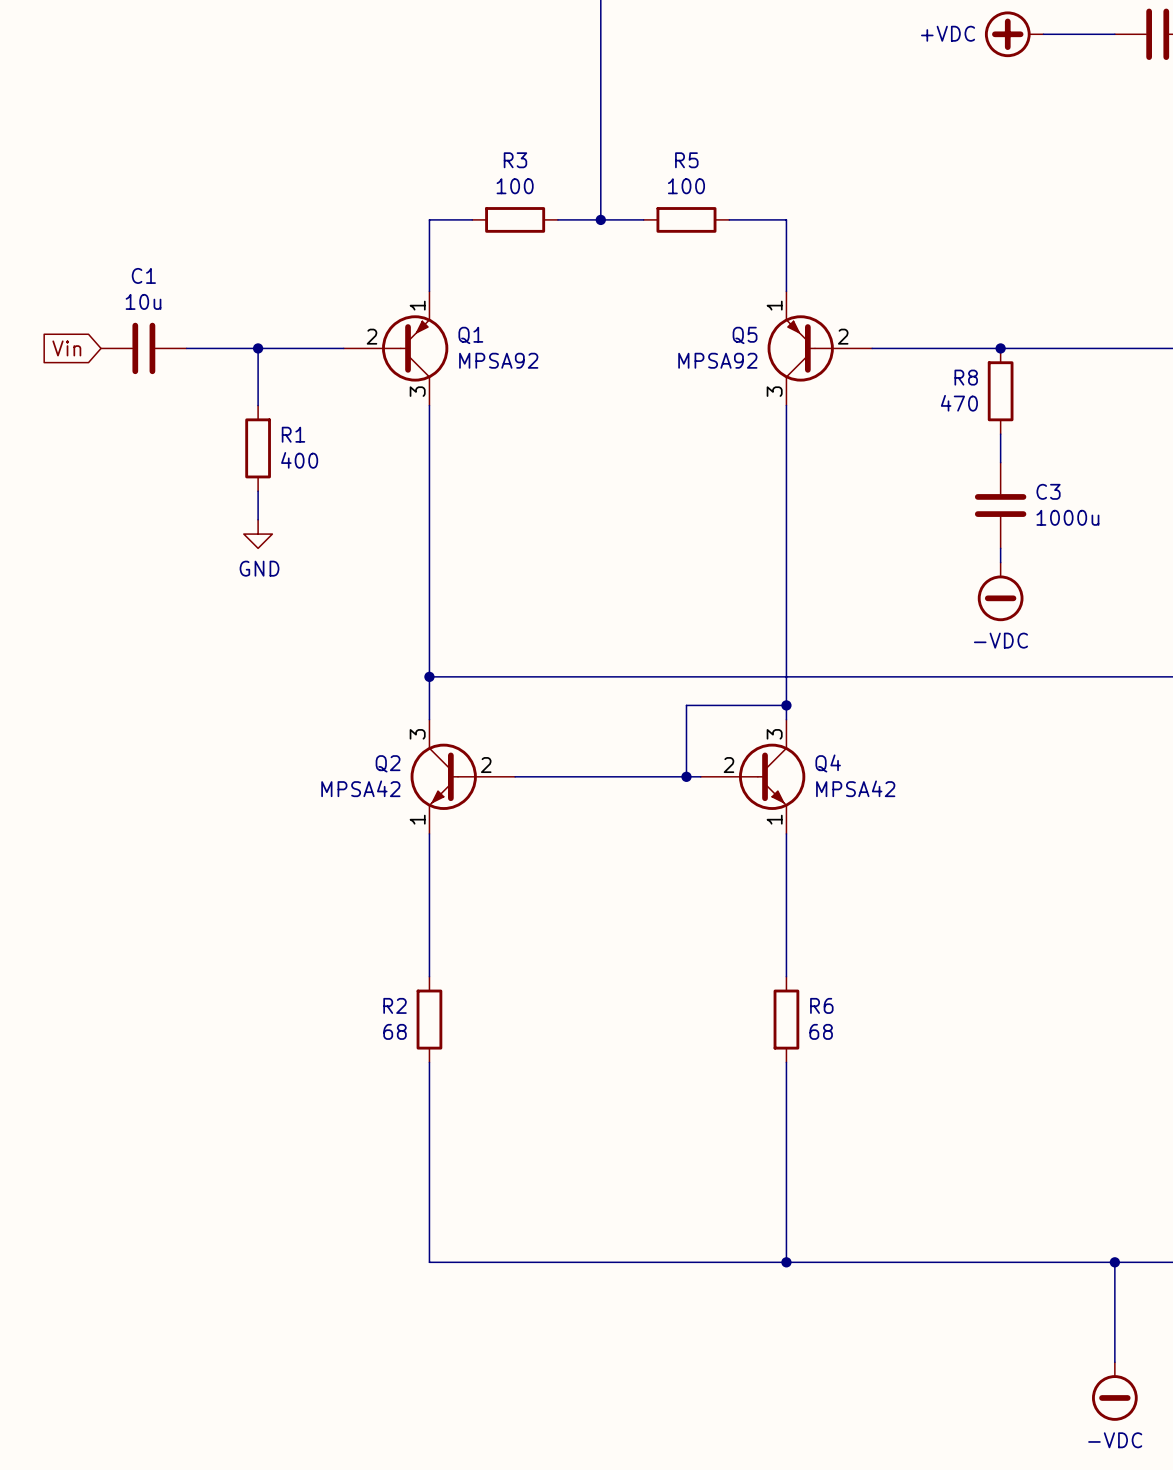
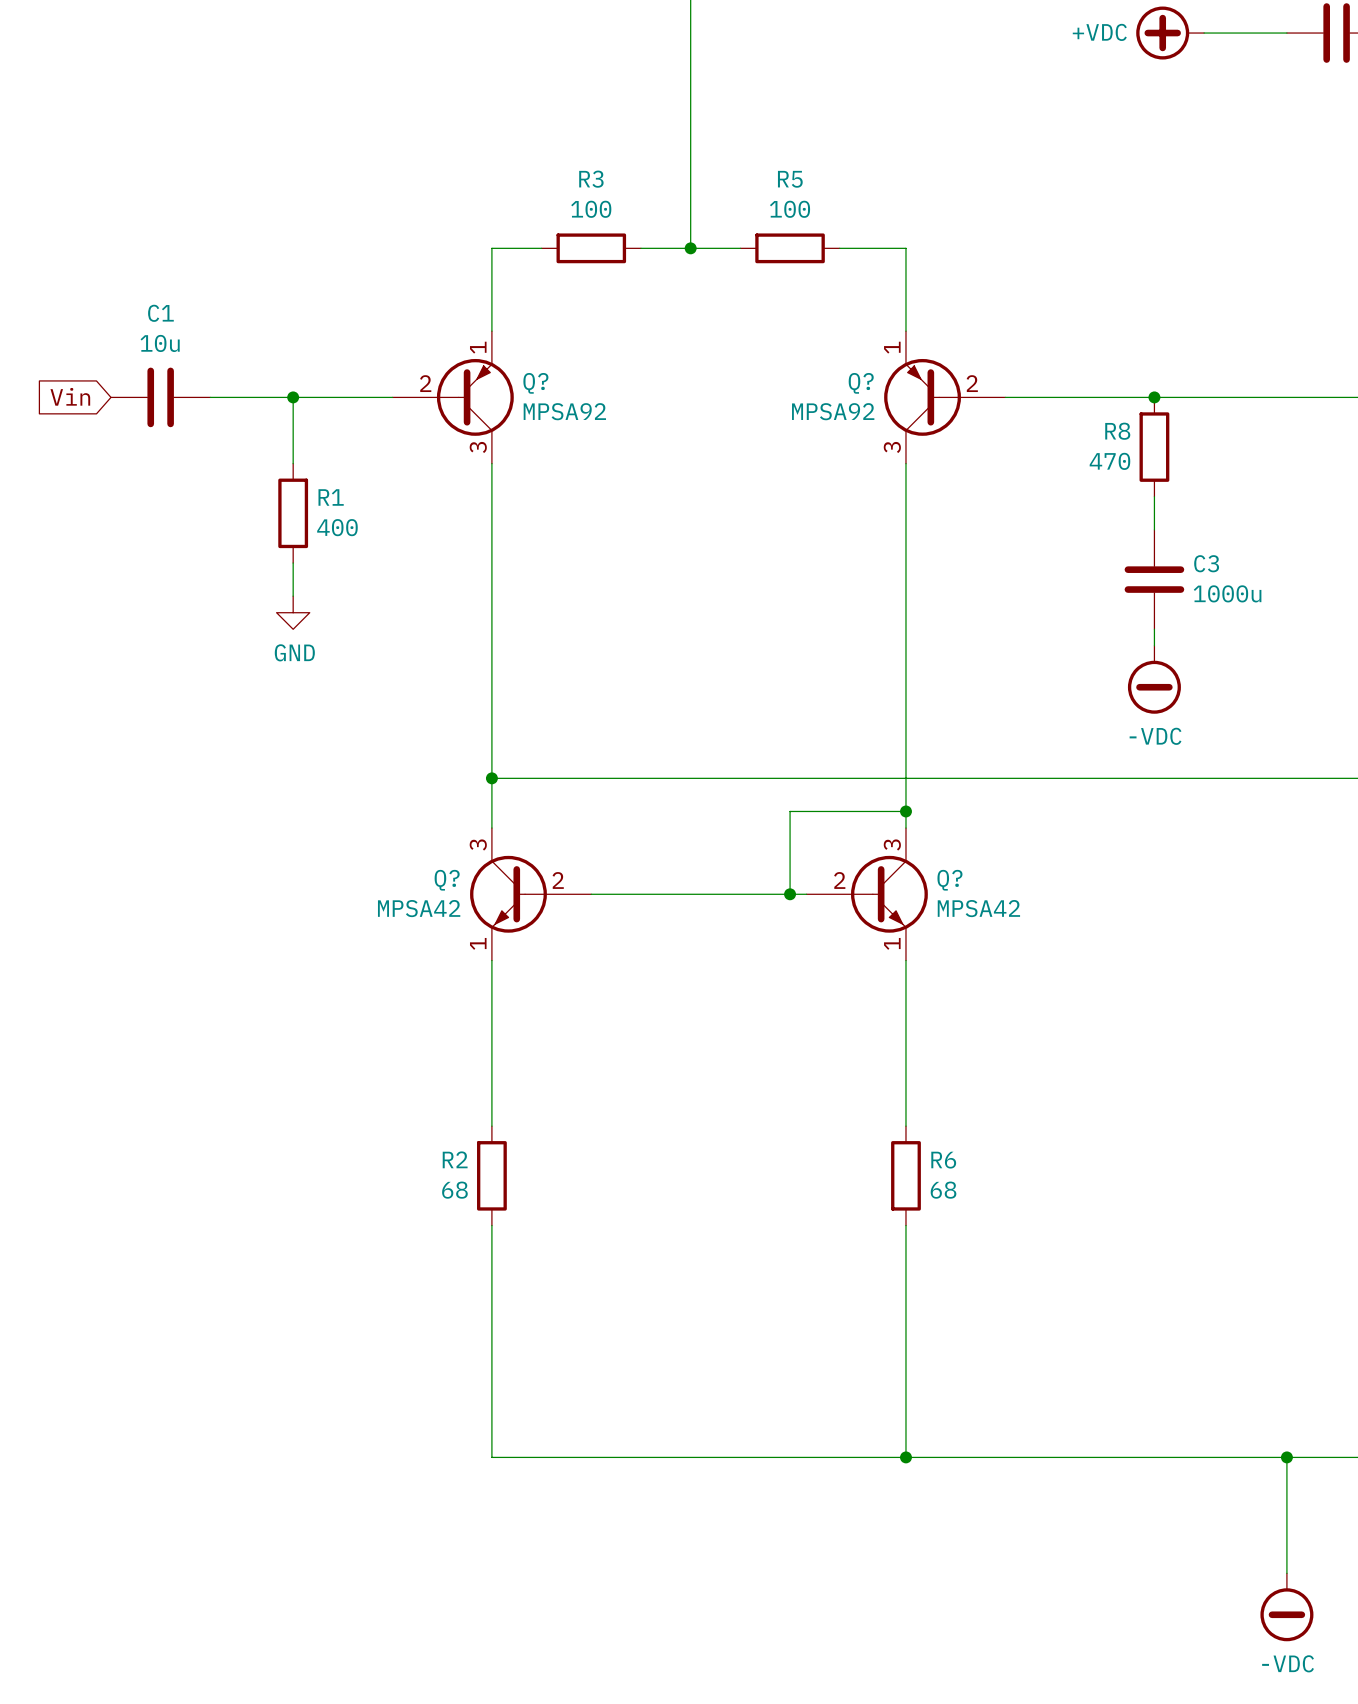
Q1 name: Q1 (470, 335) -> Q? (535, 383)
Q5 name: Q5 (745, 335) -> Q? (861, 383)
Q2 name: Q2 (388, 763) -> Q? (447, 880)
Q4 name: Q4 (828, 763) -> Q? (949, 880)

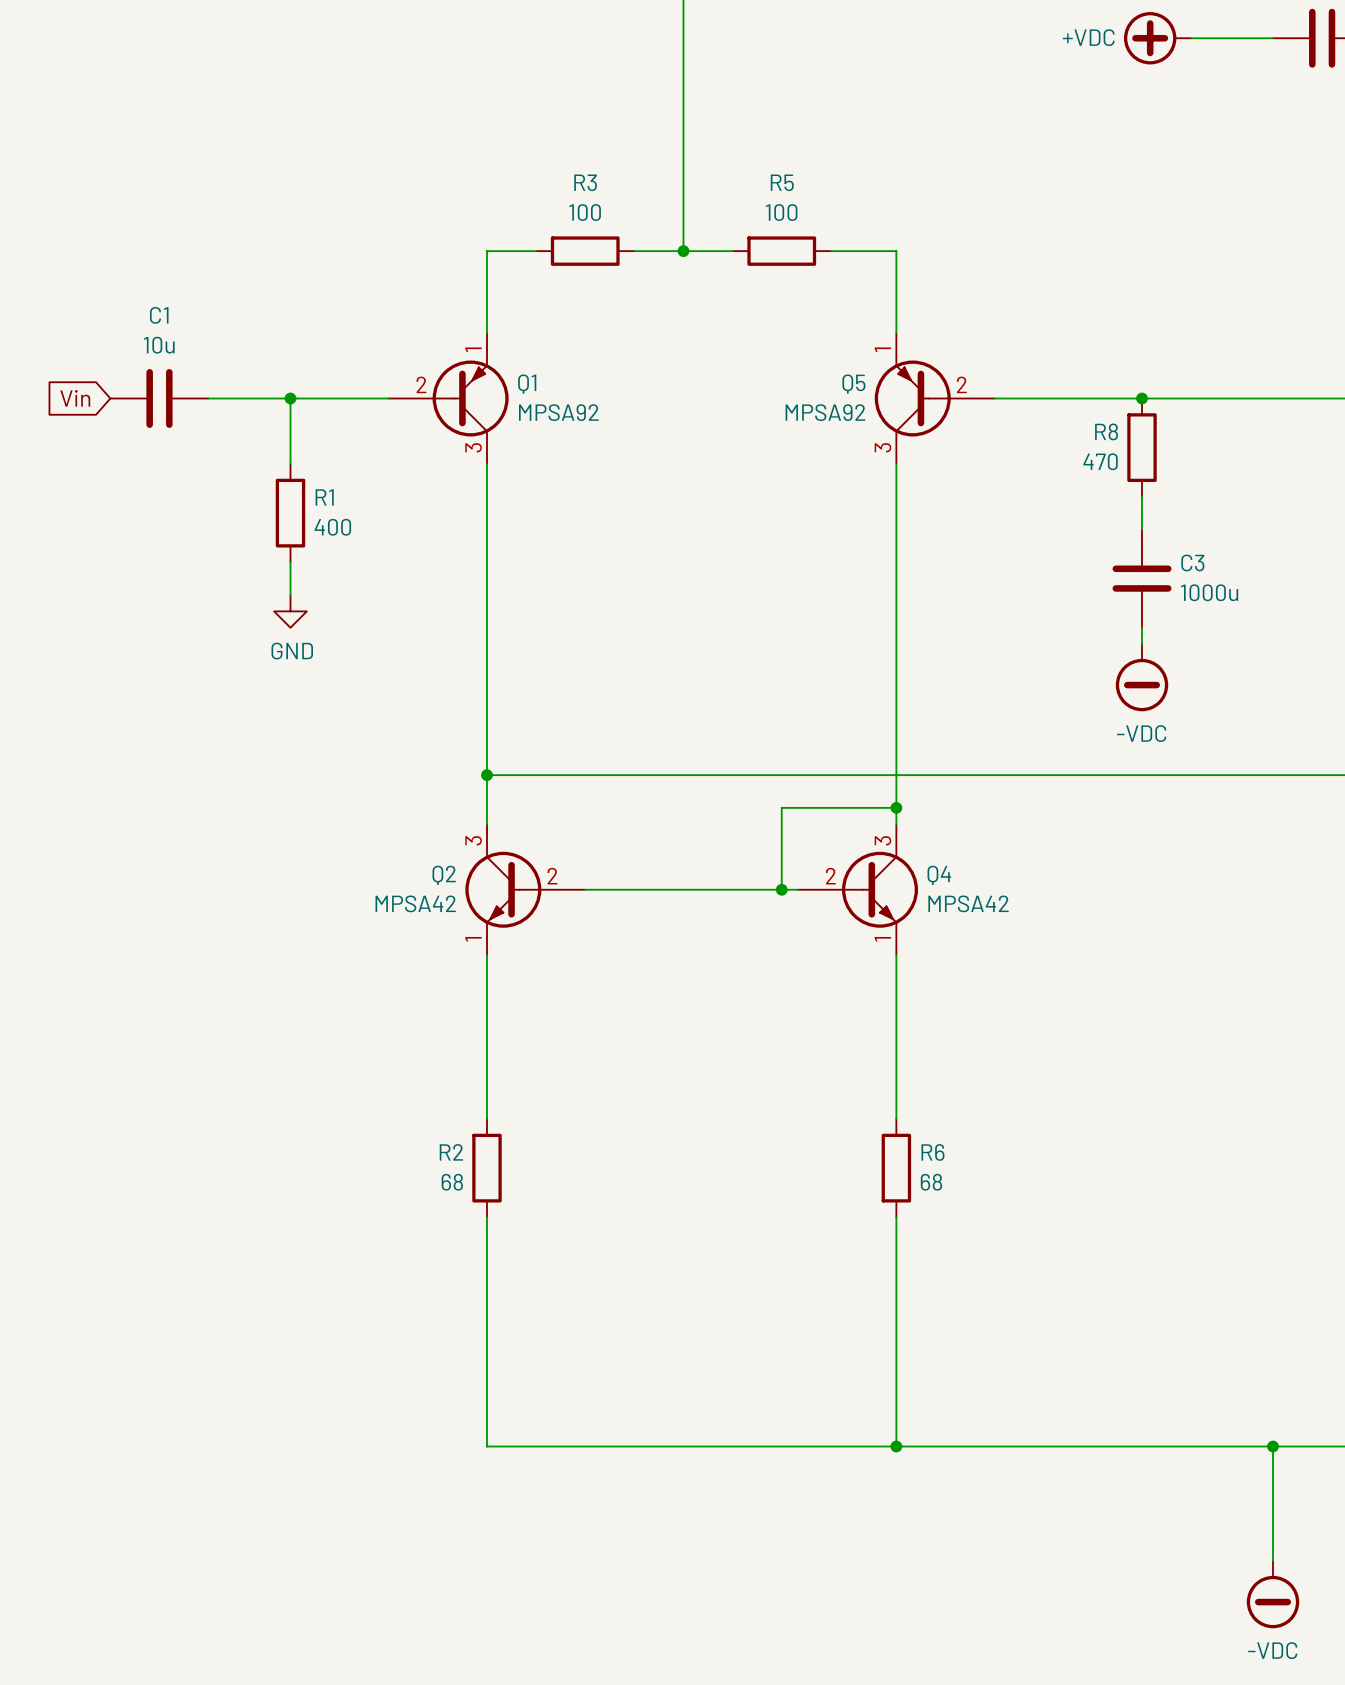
Q? name: Q? (535, 383) -> Q1 (527, 384)
Q? name: Q? (861, 383) -> Q5 (853, 384)
Q? name: Q? (447, 880) -> Q2 (444, 875)
Q? name: Q? (949, 880) -> Q4 (939, 875)

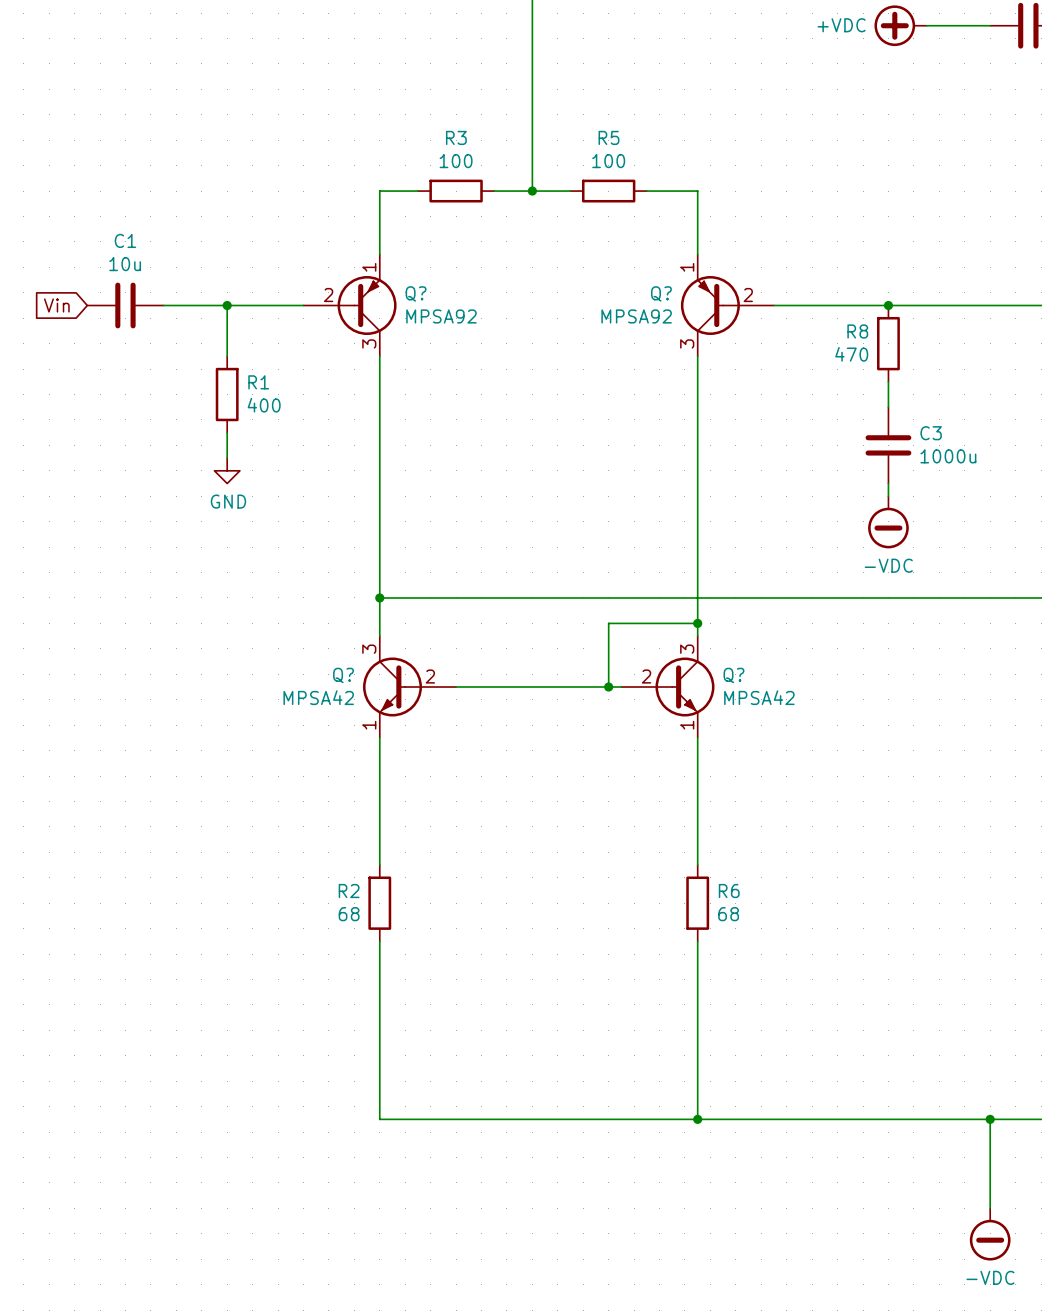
Q1 name: Q1 (527, 384) -> Q? (416, 293)
Q5 name: Q5 (853, 384) -> Q? (661, 293)
Q2 name: Q2 (444, 875) -> Q? (343, 675)
Q4 name: Q4 (939, 875) -> Q? (733, 675)

